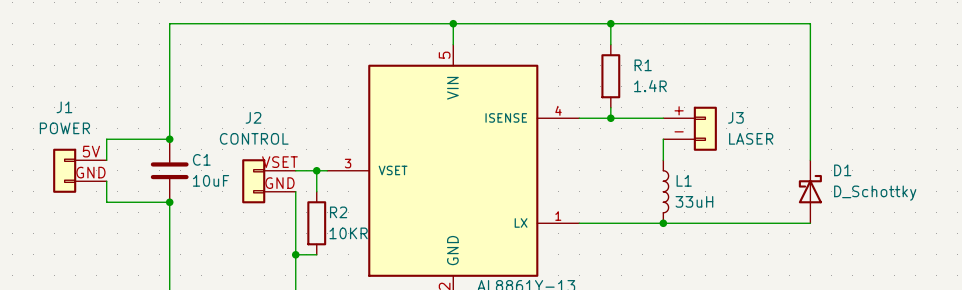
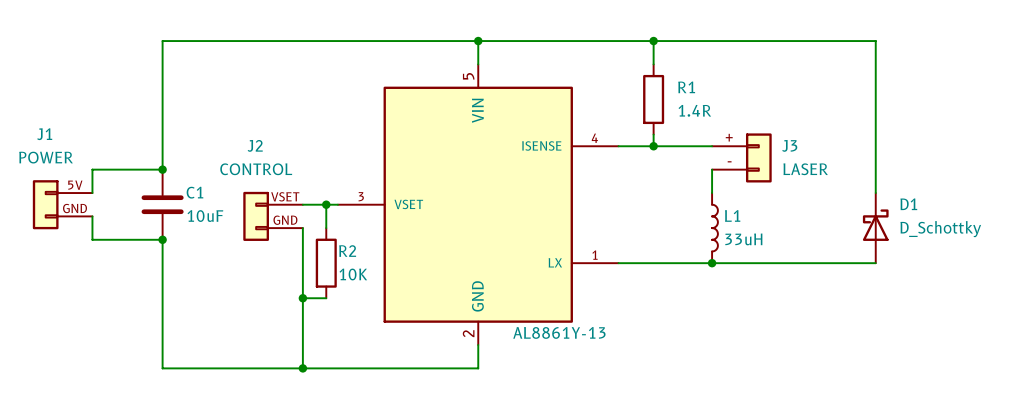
J1 symbol: [53, 148, 107, 193] -> [32, 180, 93, 230]
J2 symbol: [242, 159, 296, 204] -> [243, 191, 303, 241]
R2 value: 10KR (348, 233) -> 10K (353, 274)

